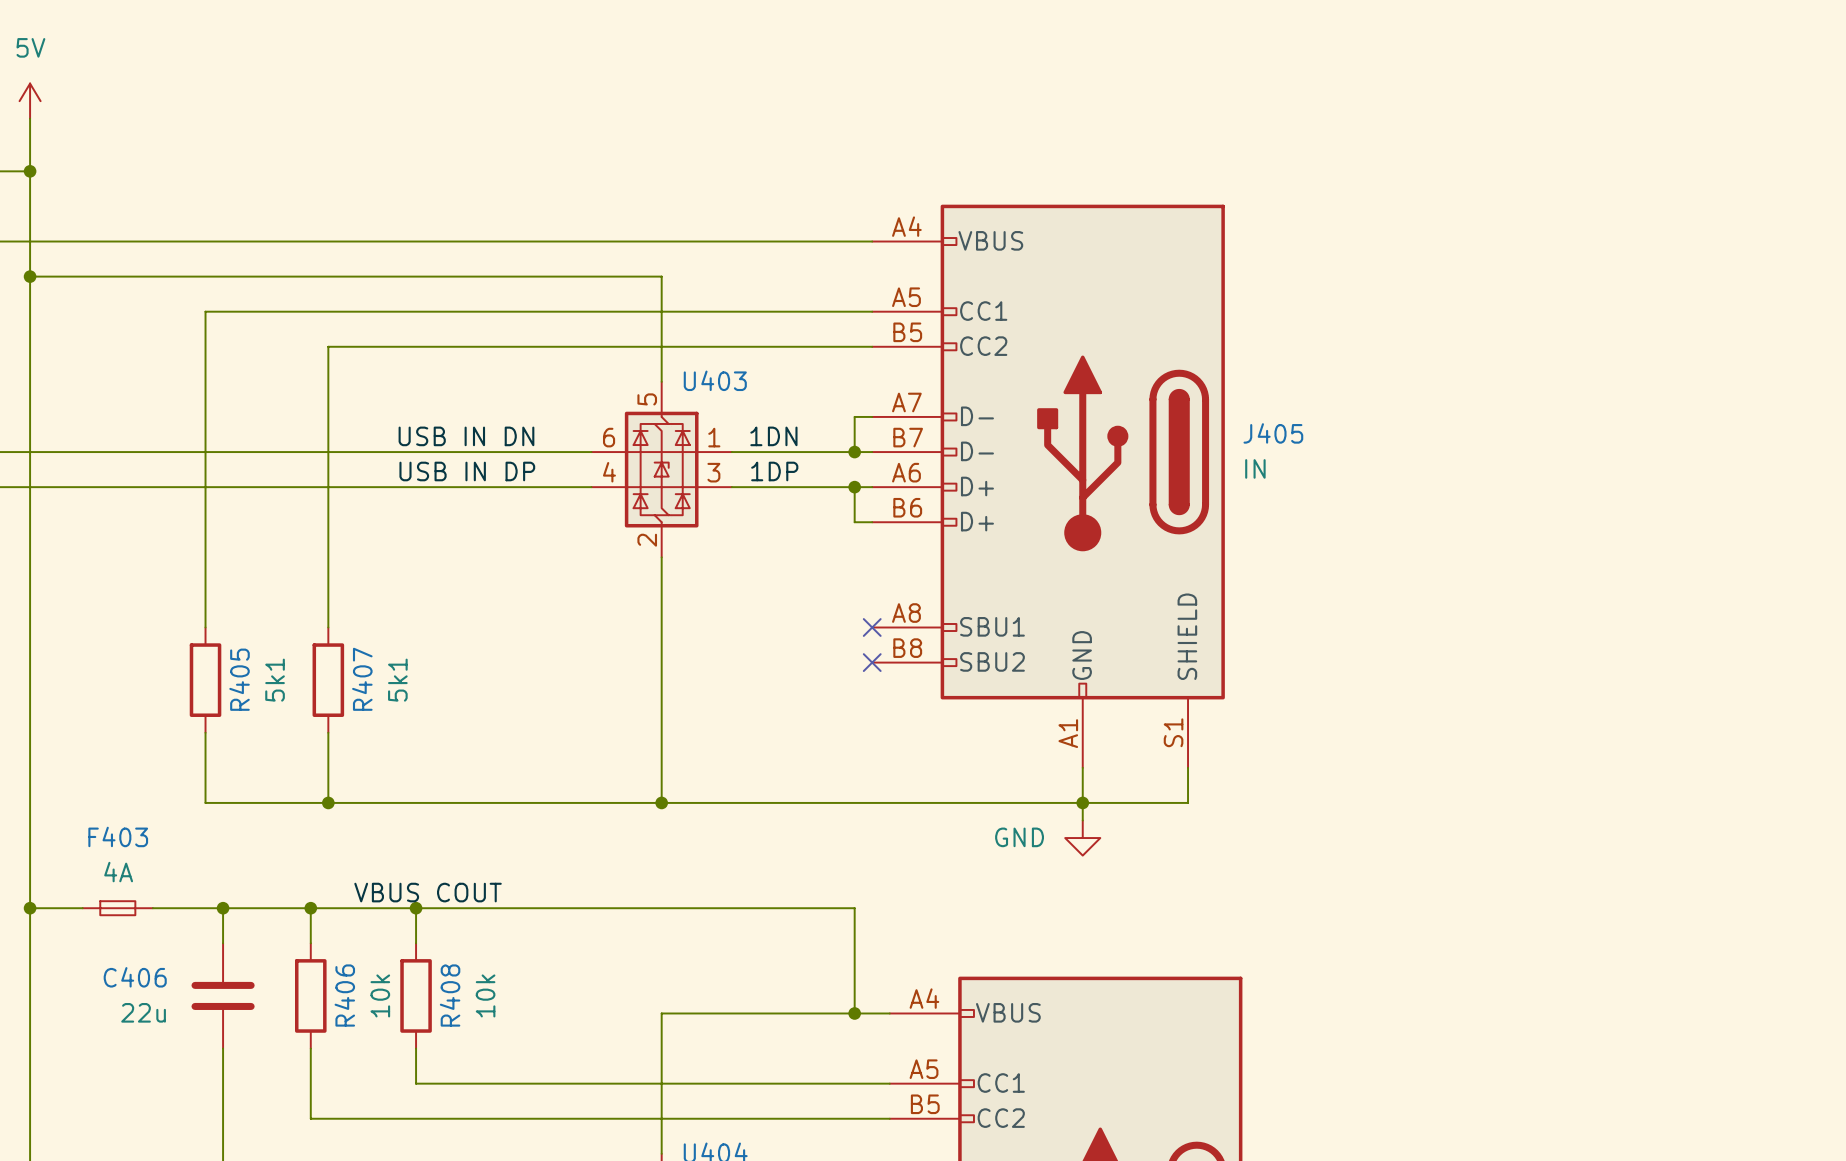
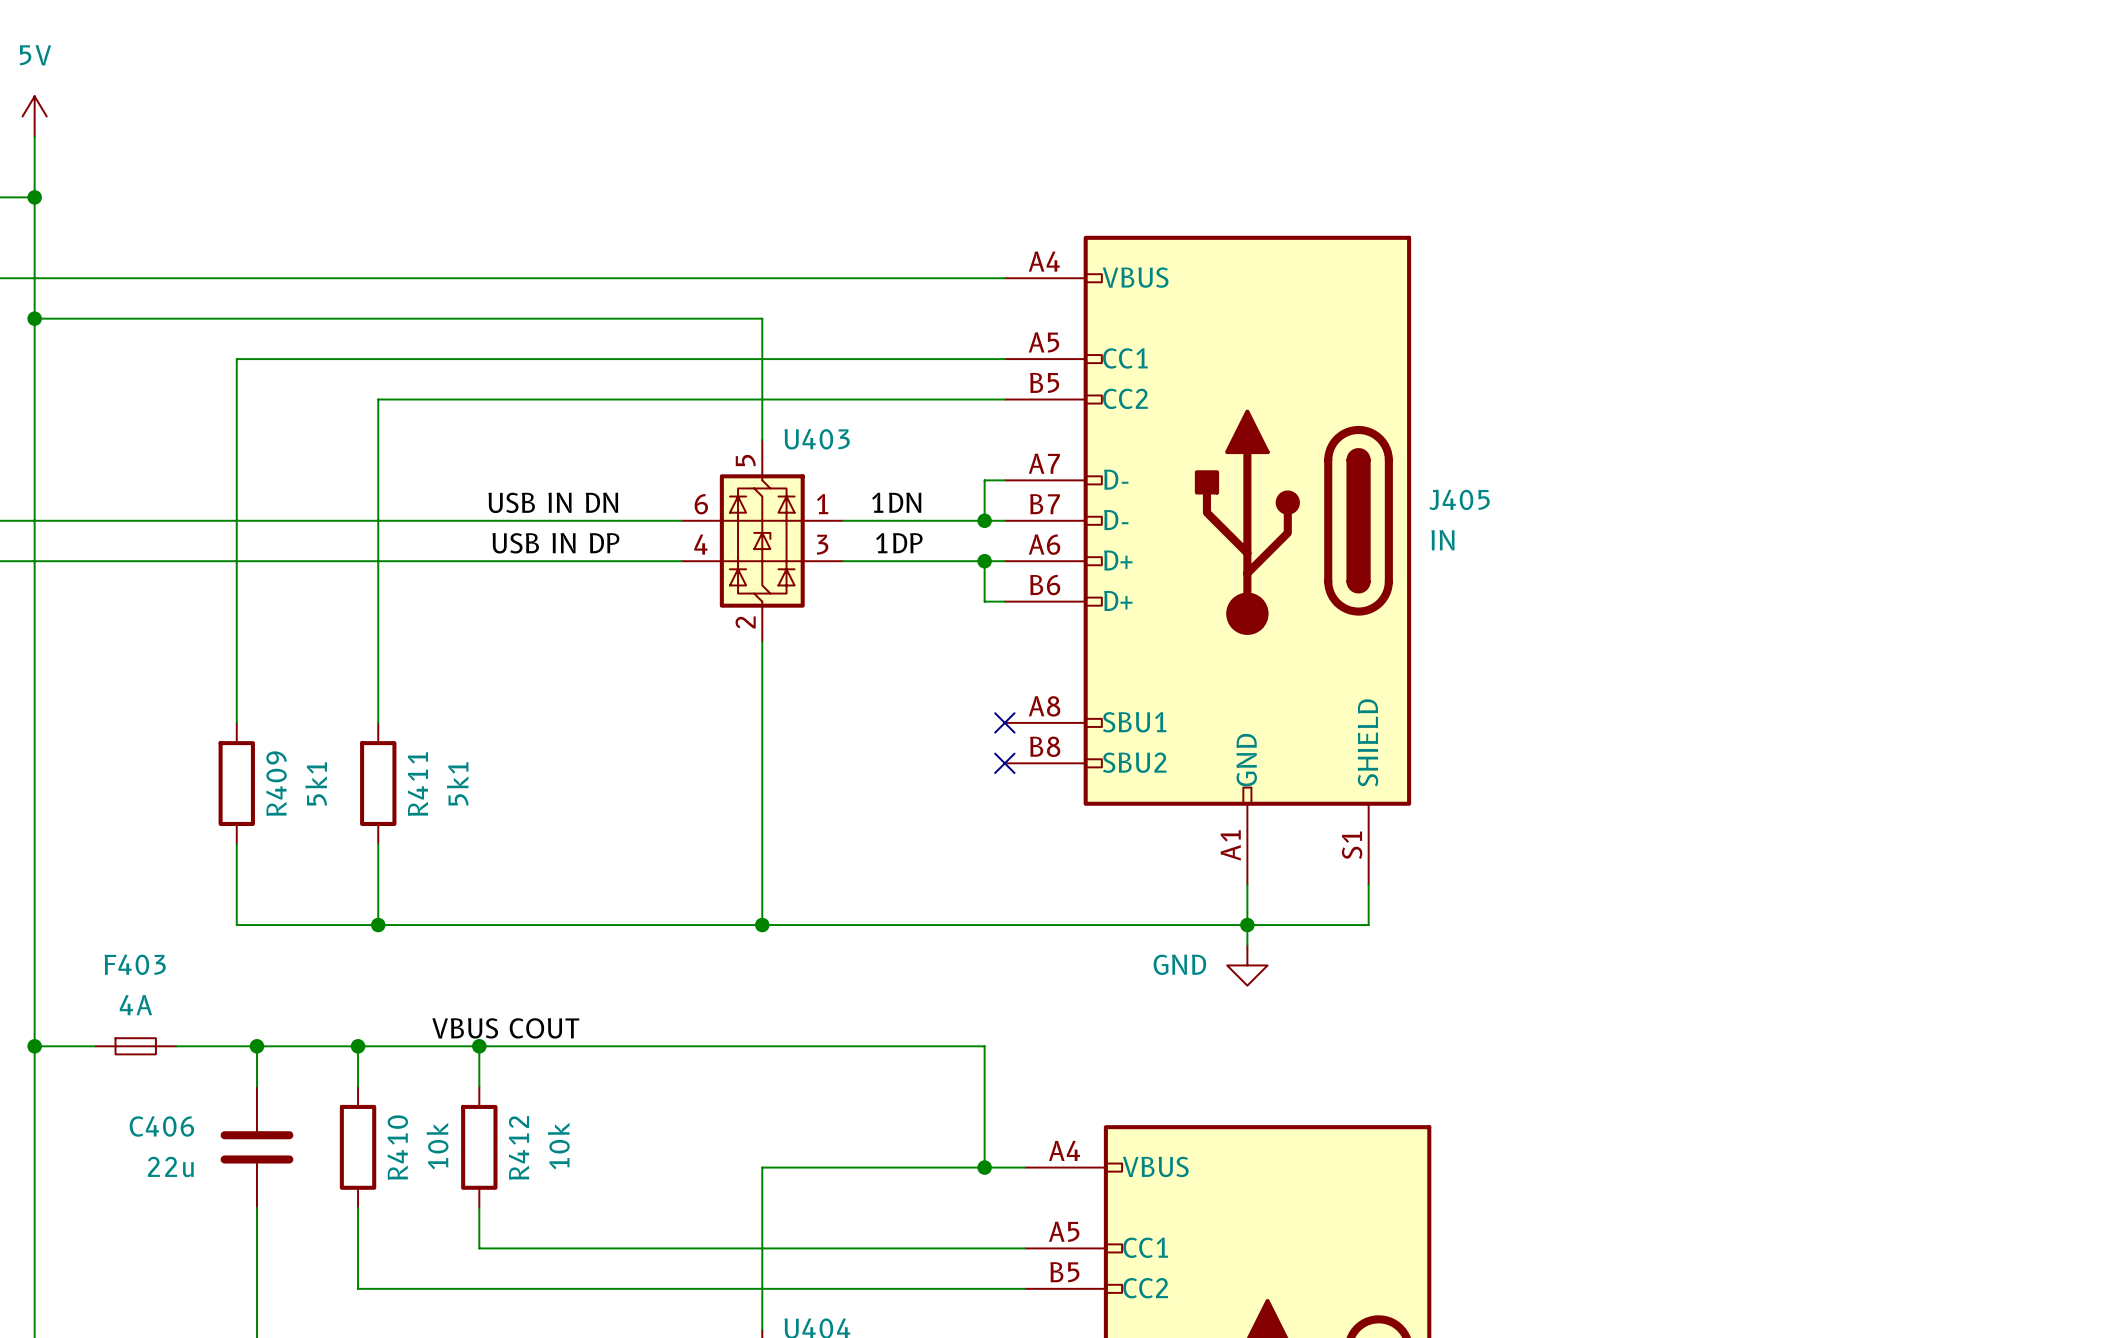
R405 name: R405 (239, 679) -> R409 (276, 783)
R407 name: R407 (362, 679) -> R411 (417, 784)
R406 name: R406 (344, 995) -> R410 (397, 1147)
R408 name: R408 (450, 995) -> R412 (518, 1147)

